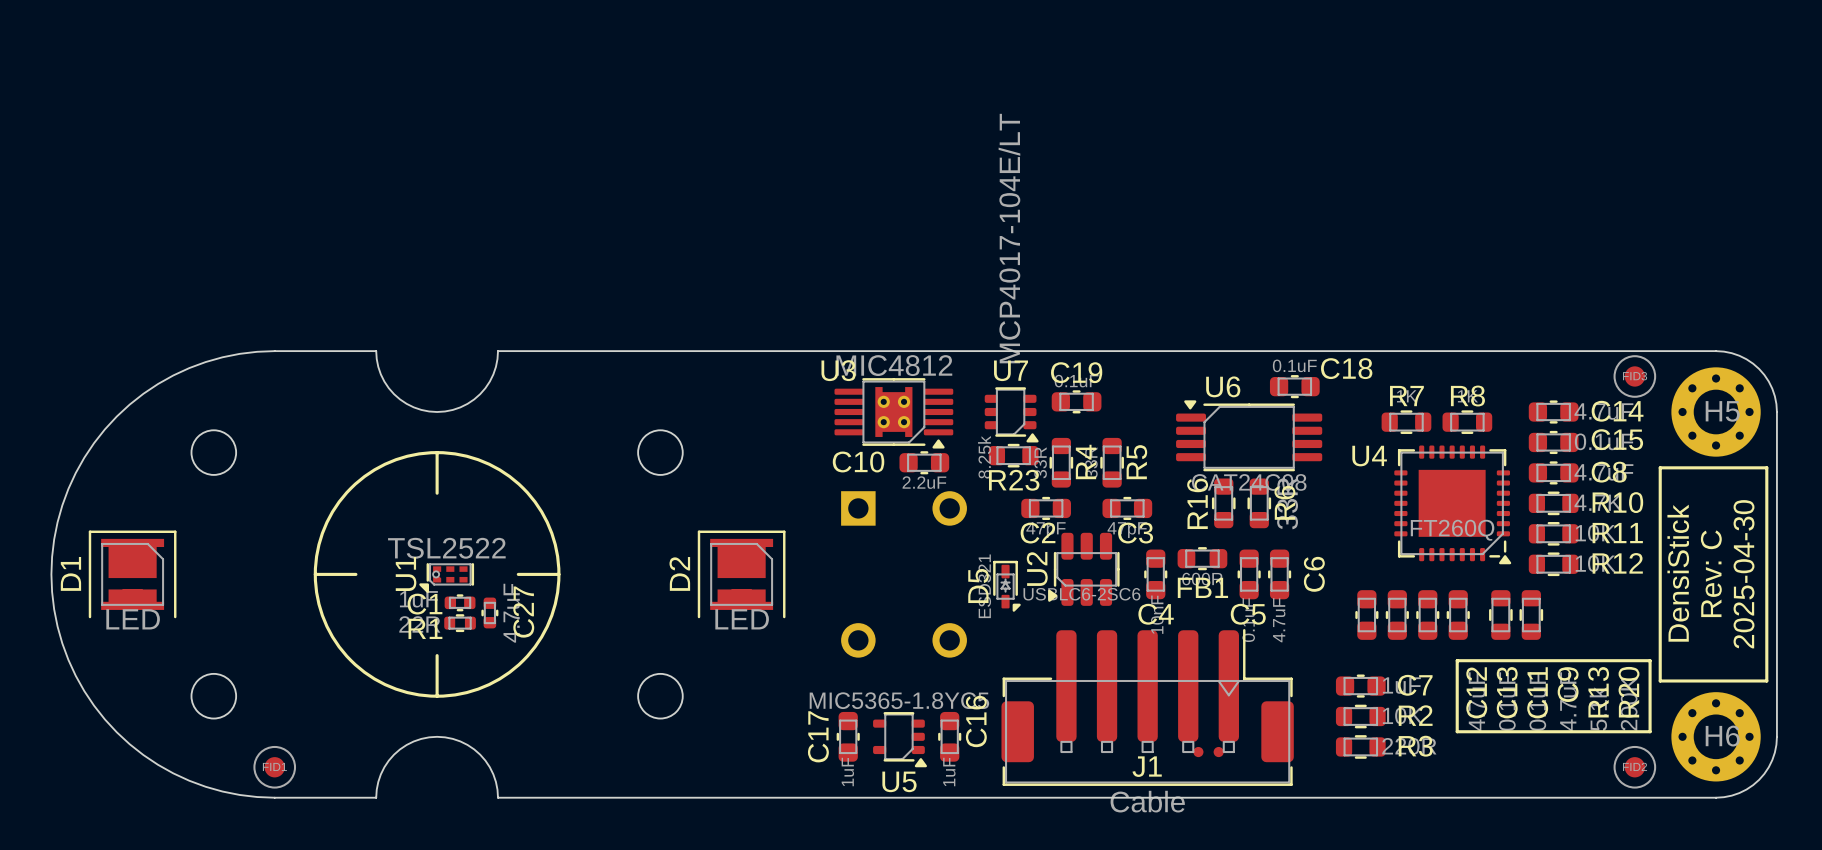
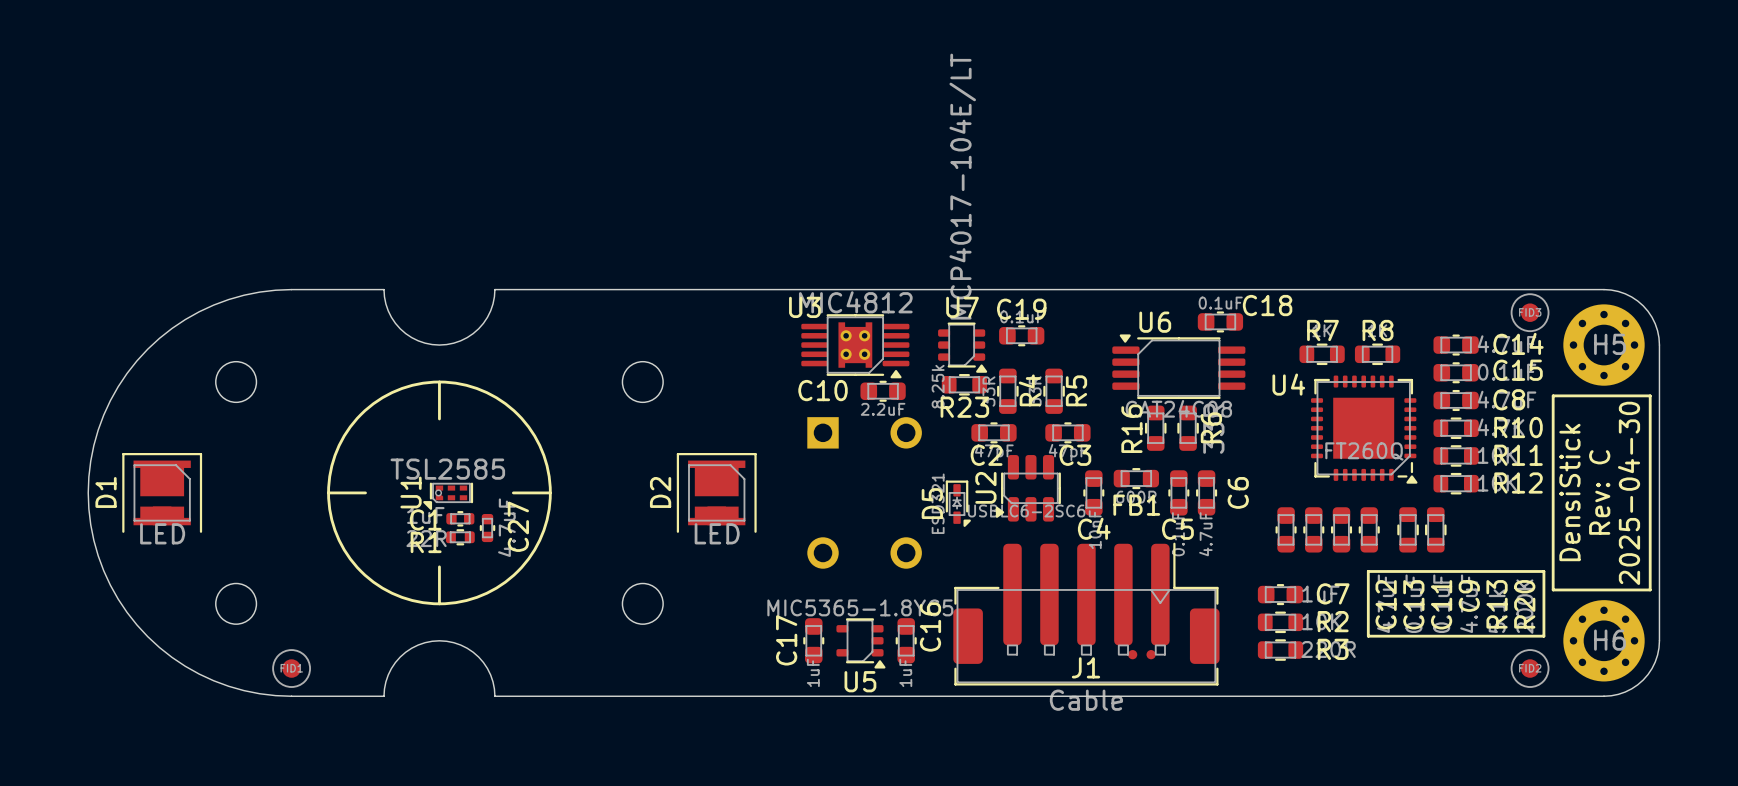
U1 value: TSL2522 (446, 548) -> TSL2585 (447, 469)

